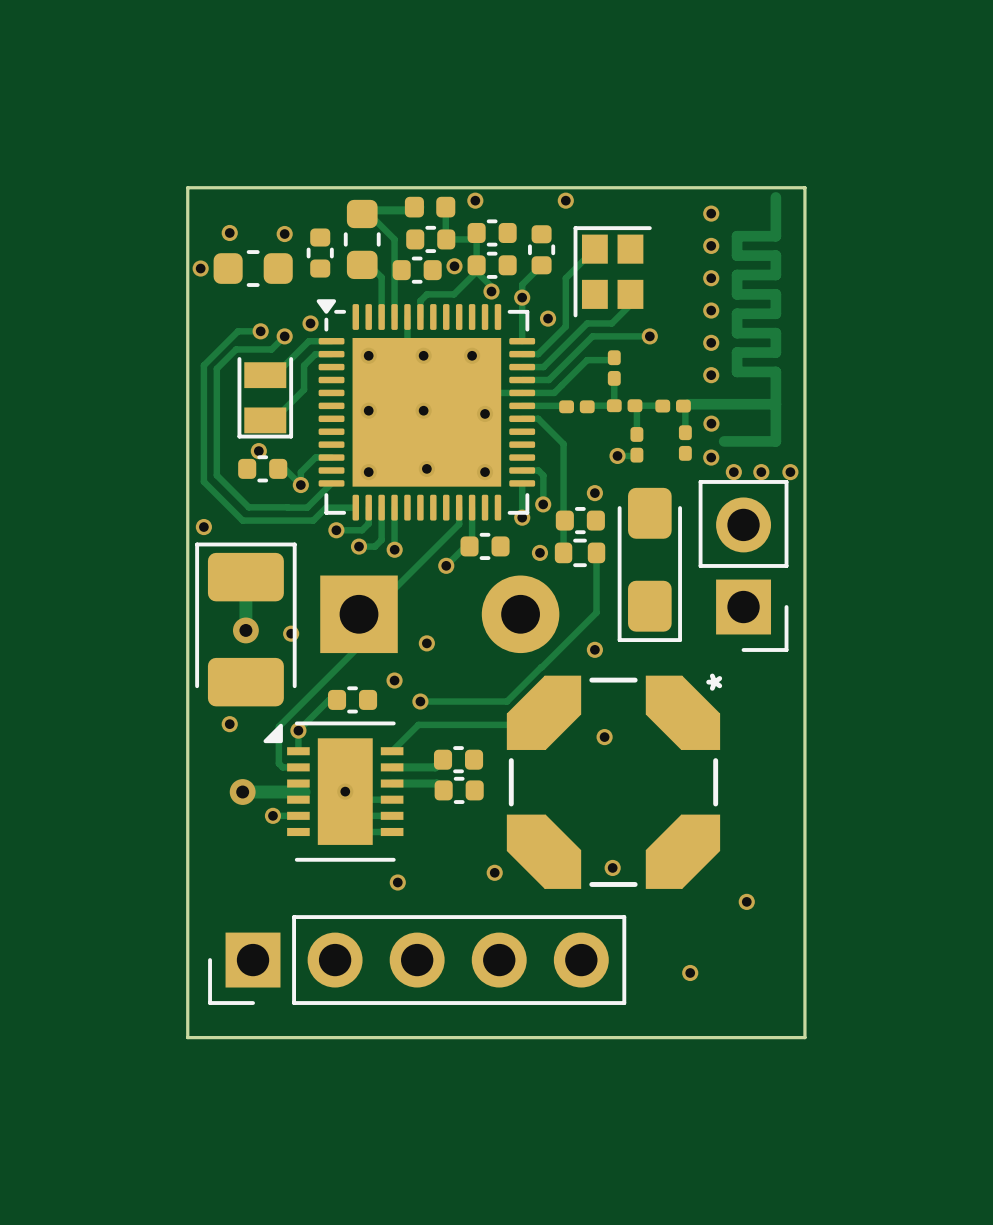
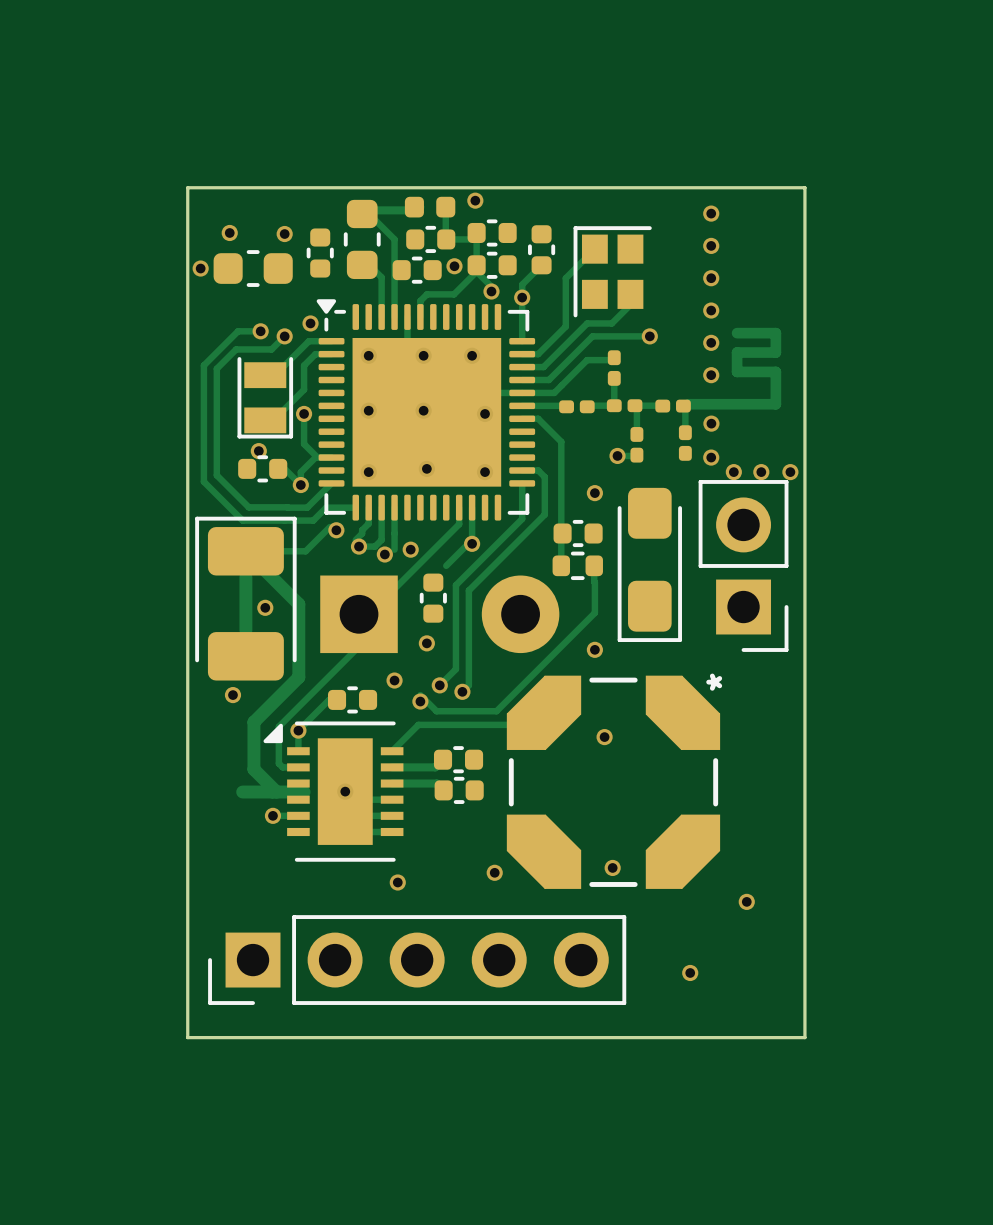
track: (775, 197) (775, 236) (737, 236) (737, 255) (775, 255) (775, 274) (737, 274) (737, 294) (775, 294) (775, 313) (737, 313) (737, 333) -> none
via: (565, 200) -> none
via: (548, 318) -> none
track: (775, 404) (775, 441) (724, 441) -> none
track: none -> (304, 413) (304, 444) (317, 457)
via: none -> (304, 413)
track: (561, 441) (563, 444) (563, 552) -> (561, 441) (561, 565)
track: (543, 475) (543, 504) -> (543, 475) (544, 514) (468, 590) (468, 685) (462, 691)
via: (543, 504) -> none
track: none -> (522, 517) (455, 585) (455, 669) (439, 685)
via: (522, 517) -> none
part position: (580, 520) -> (578, 533)
via: (203, 527) -> none
track: none -> (329, 527) (305, 551) (245, 551) (298, 604) (298, 677) (253, 722) (253, 769) (276, 792)
track: (336, 530) (362, 530) -> (355, 539) (362, 533) (362, 530)
via: none -> (472, 543)
part: (485, 546) -> none
via: (394, 549) -> none
via: none -> (410, 549)
via: (539, 552) -> none
part position: (580, 552) -> (577, 565)
track: (596, 552) (596, 612) (541, 667) -> none
via: none -> (384, 554)
via: (446, 565) -> none
track: none -> (594, 565) (594, 612) (496, 711) (436, 711) (420, 695)
part: none -> (433, 598)
part position: (245, 624) -> (245, 598)
via: (245, 630) -> none
via position: (291, 633) -> (265, 607)
track: (541, 667) (507, 701) (420, 701) -> none
via: none -> (439, 685)
via: none -> (462, 691)
via position: (229, 724) -> (232, 695)
via: (242, 792) -> none

